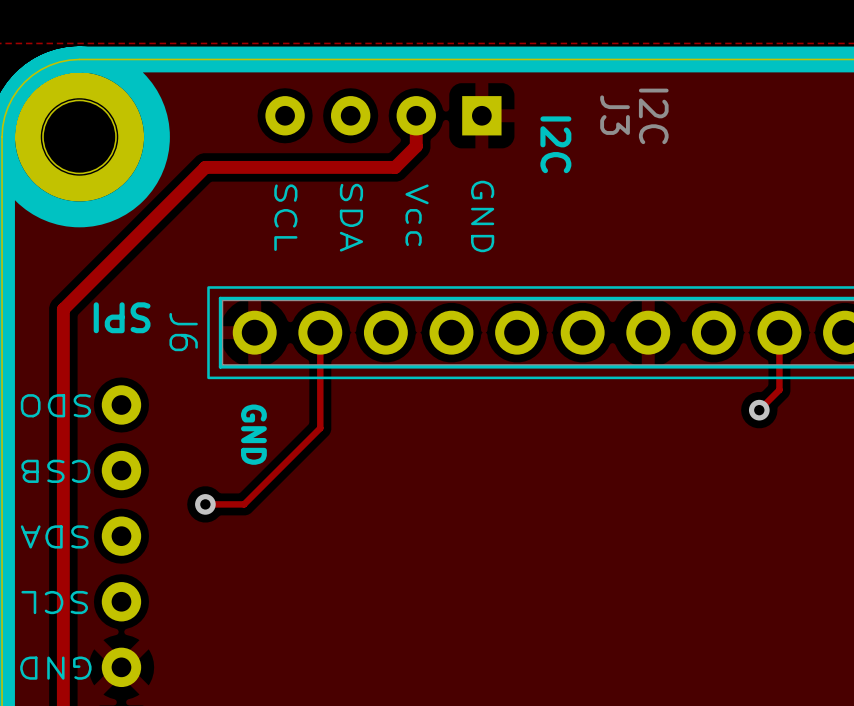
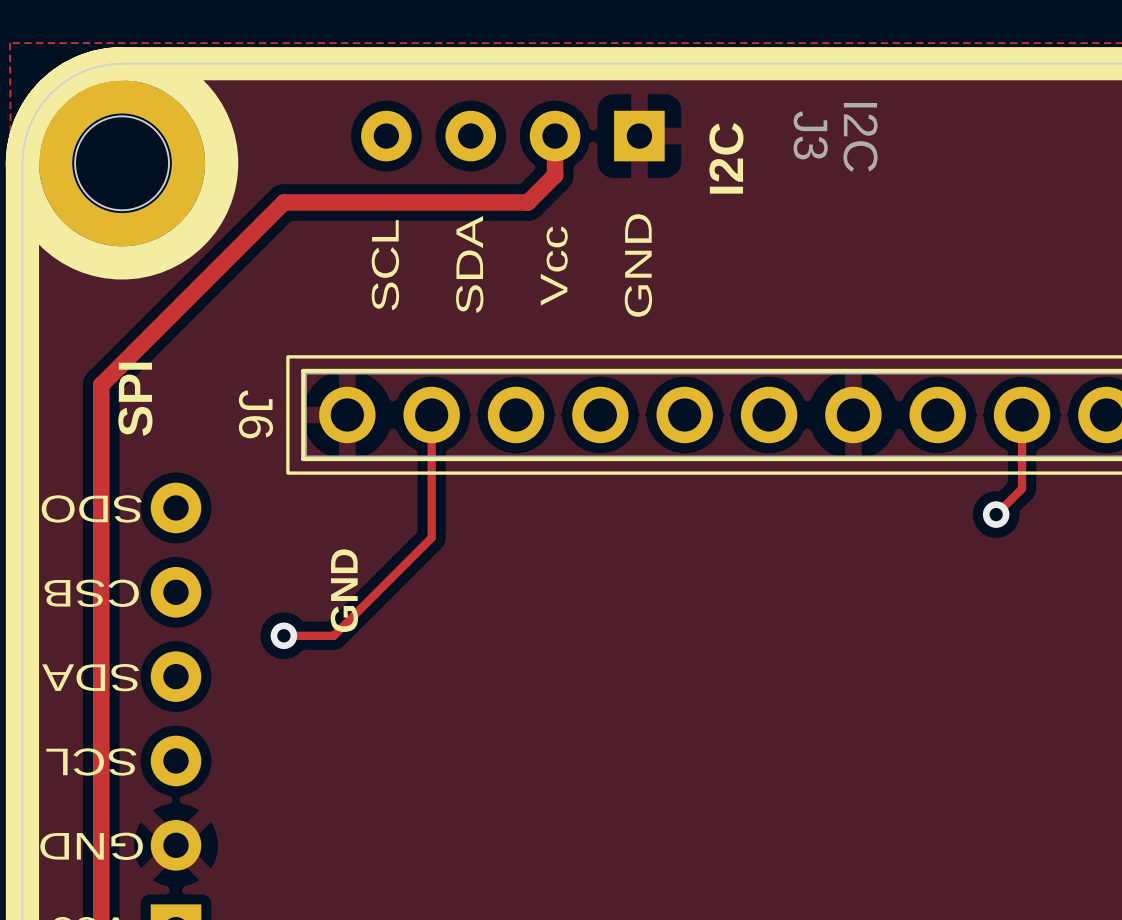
J3 footprint: [265, 96, 502, 136] -> [361, 110, 665, 162]
part text rotation: 0° (122, 317) -> 90° clockwise (135, 399)
J6 text rotation: 0° (253, 434) -> 180° (344, 590)

